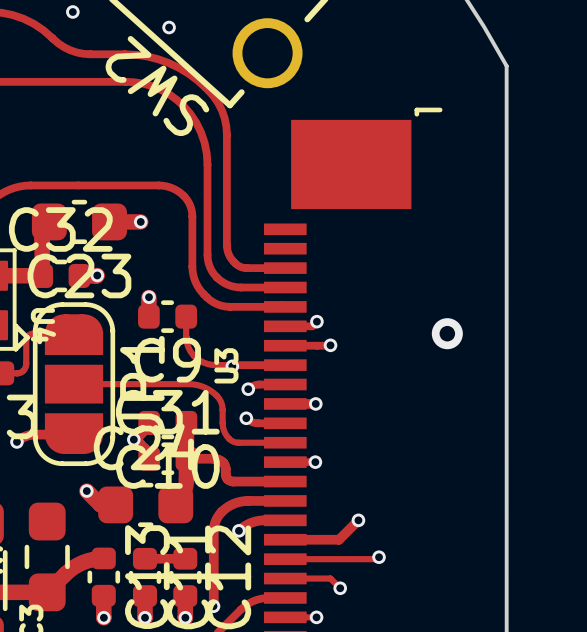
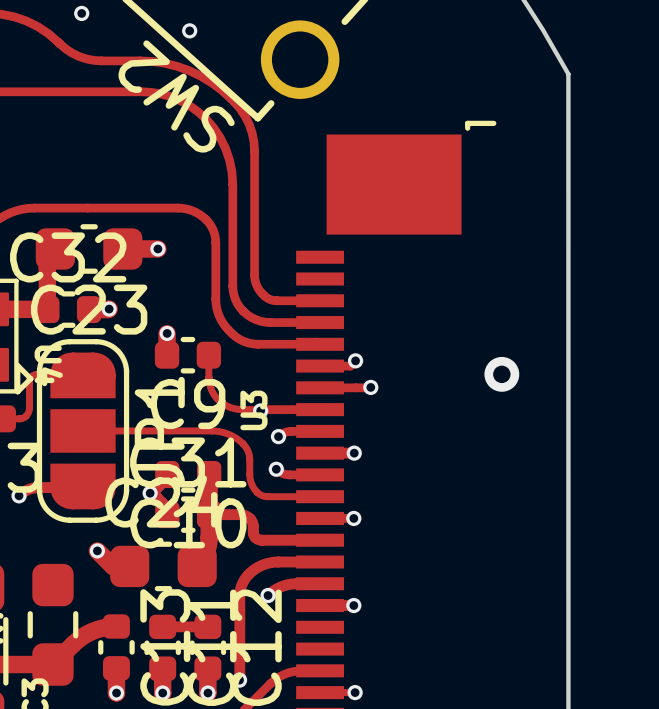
track: (358, 520) (339, 539) (315, 539) -> none
via: (358, 520) -> none
via: none -> (353, 605)
track: (379, 557) (377, 559) (285, 559) -> none
via: (379, 557) -> none
track: (285, 578) (330, 578) (340, 588) -> none
via: (340, 588) -> none

